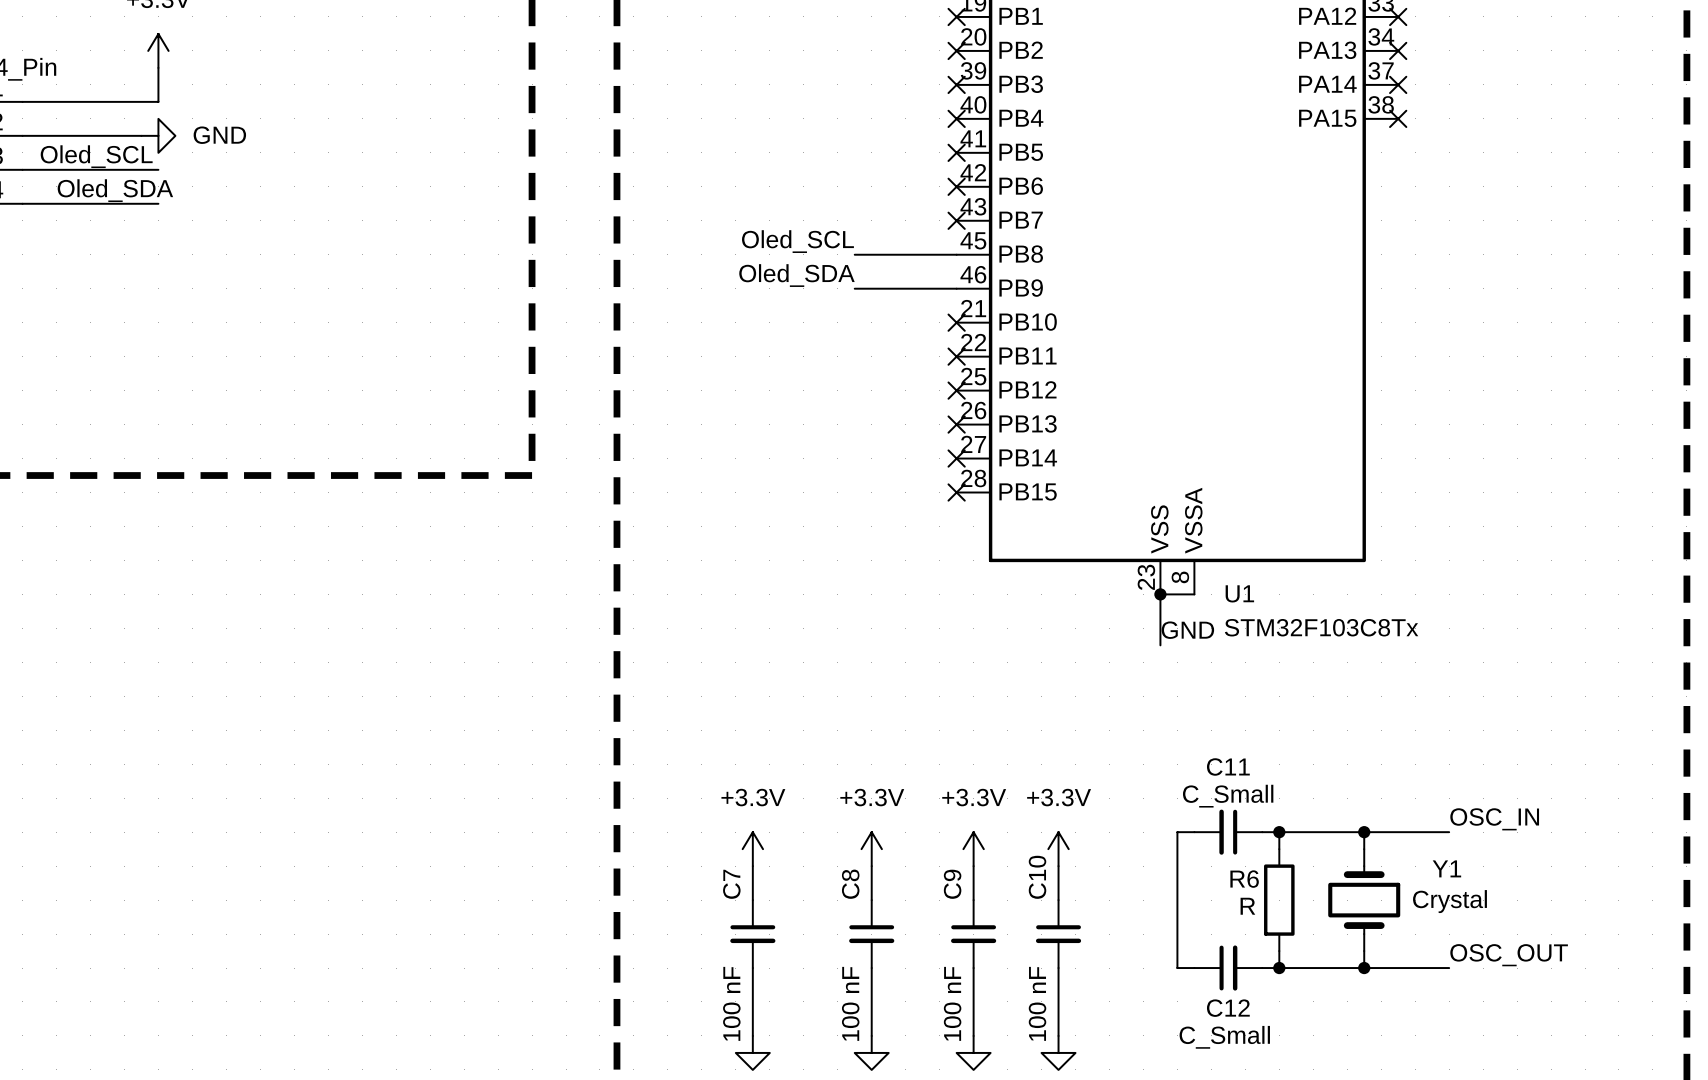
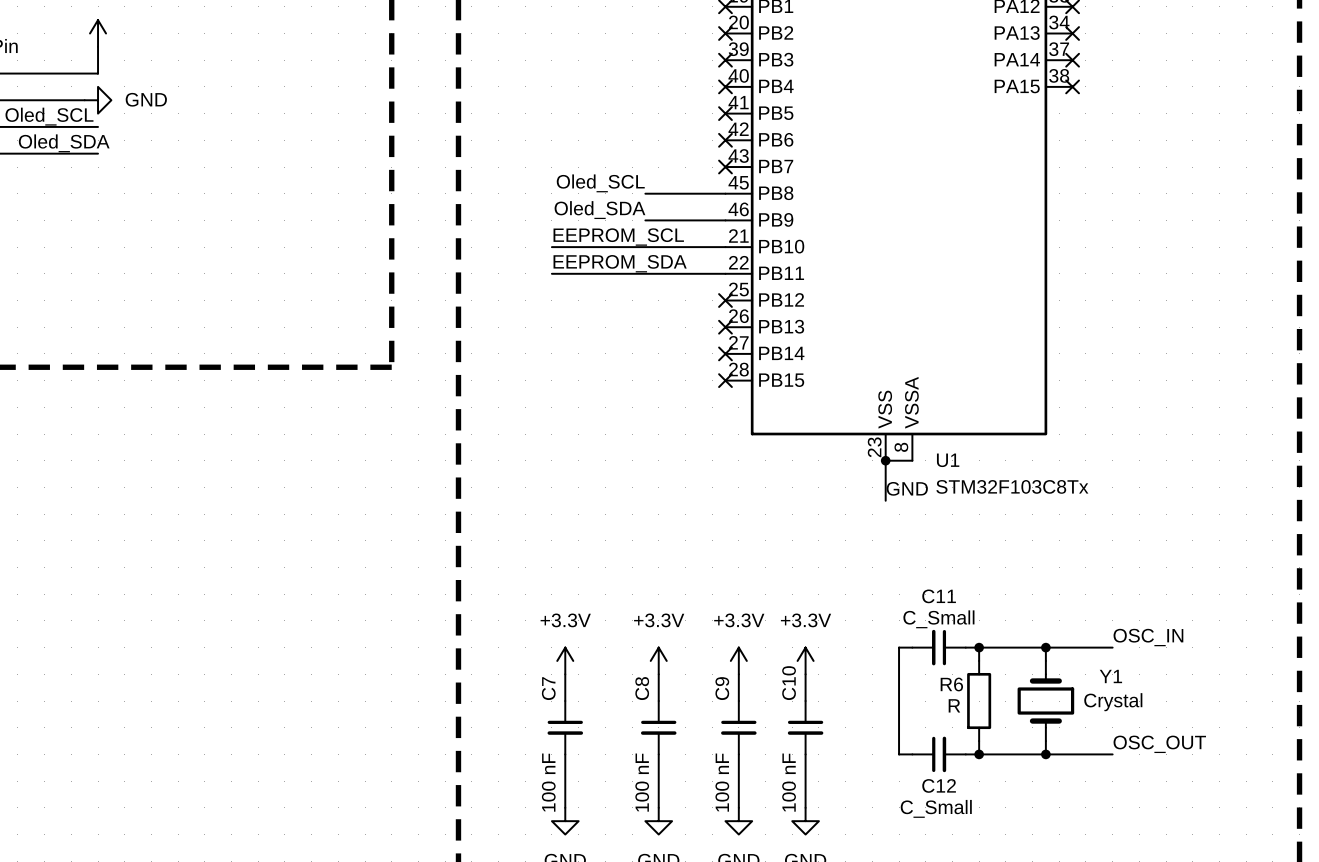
label: none -> EEPROM_SCL (618, 237)
wire: none -> (551, 247) (725, 247)
no-connect mark: (956, 322) -> none
label: none -> EEPROM_SDA (620, 263)
wire: none -> (551, 273) (725, 273)
no-connect mark: (956, 356) -> none

